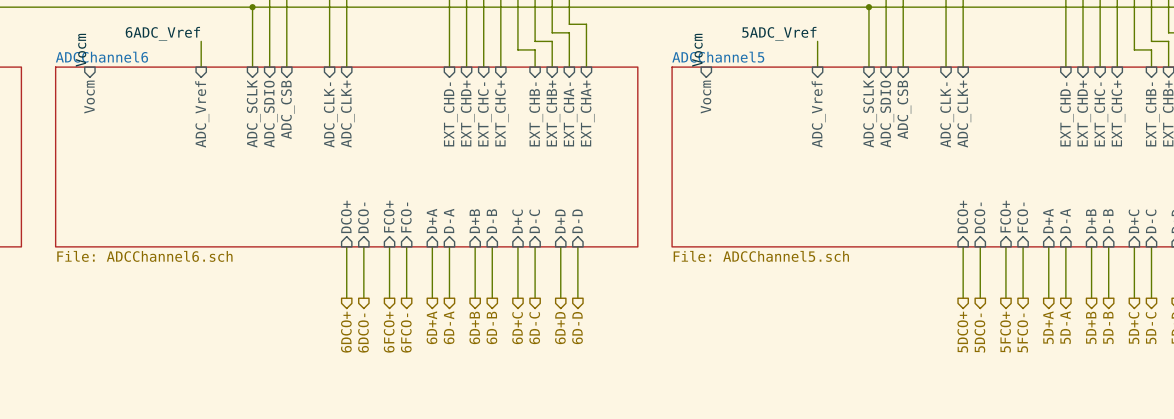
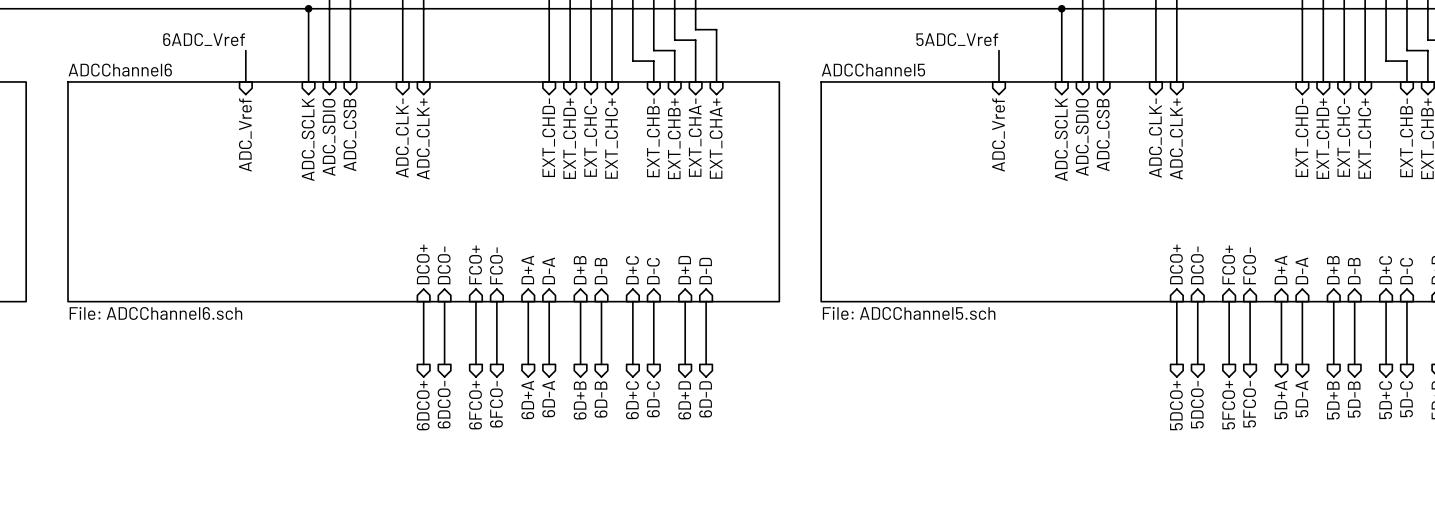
label: Vocm (81, 50) -> none
label: Vocm (697, 50) -> none
sheet pin: Vocm (89, 97) -> none
sheet pin: Vocm (706, 97) -> none

